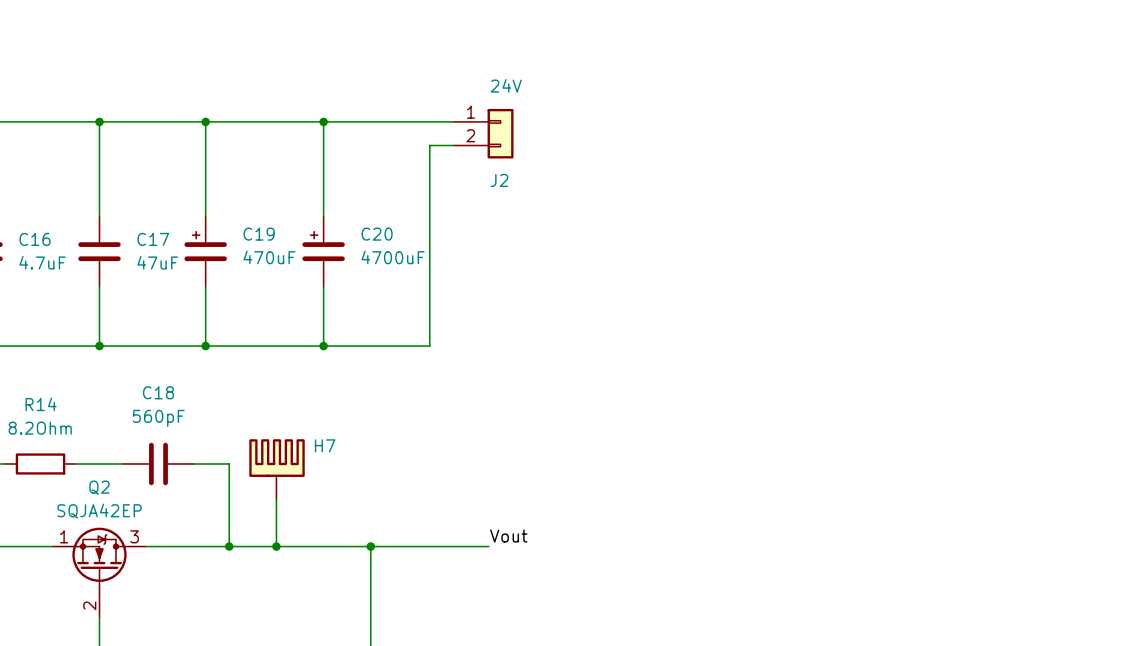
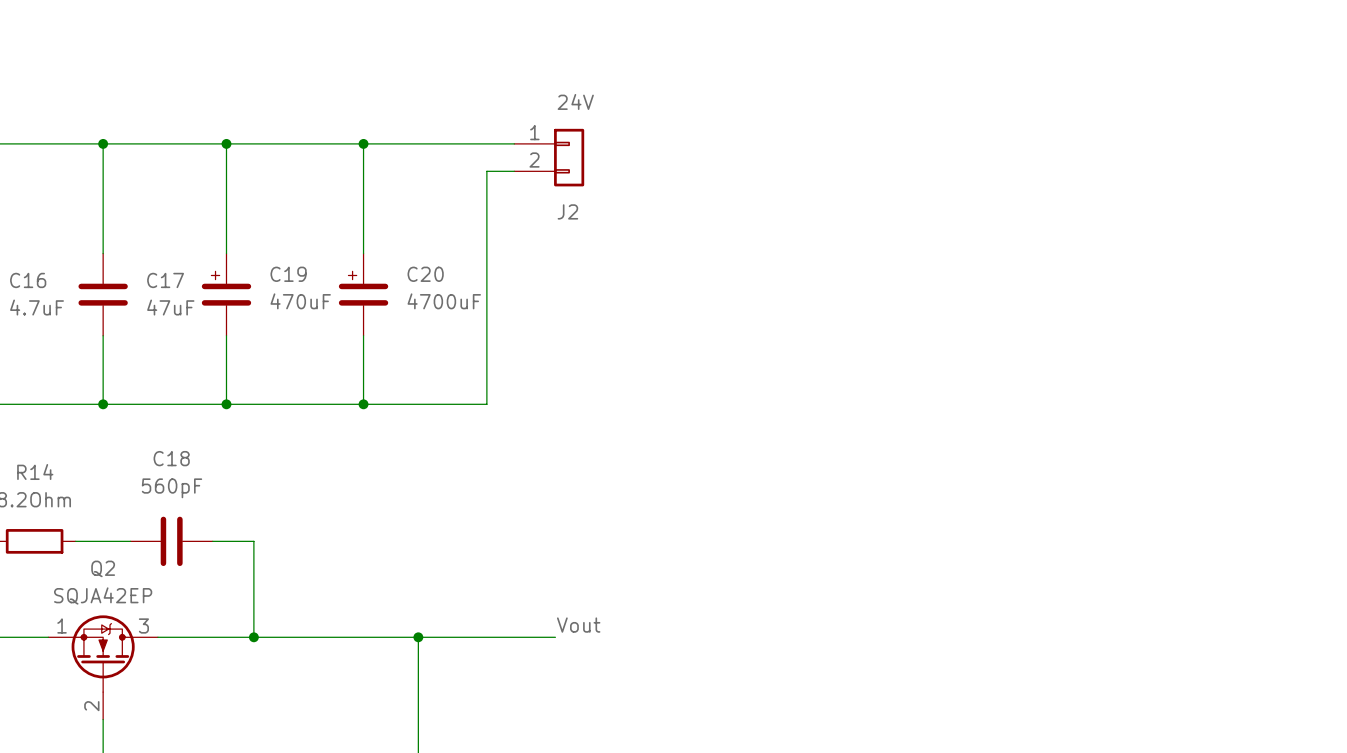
H7: (277, 469) -> none
wire: (276, 499) (276, 546) -> none
junction: (276, 546) -> none

